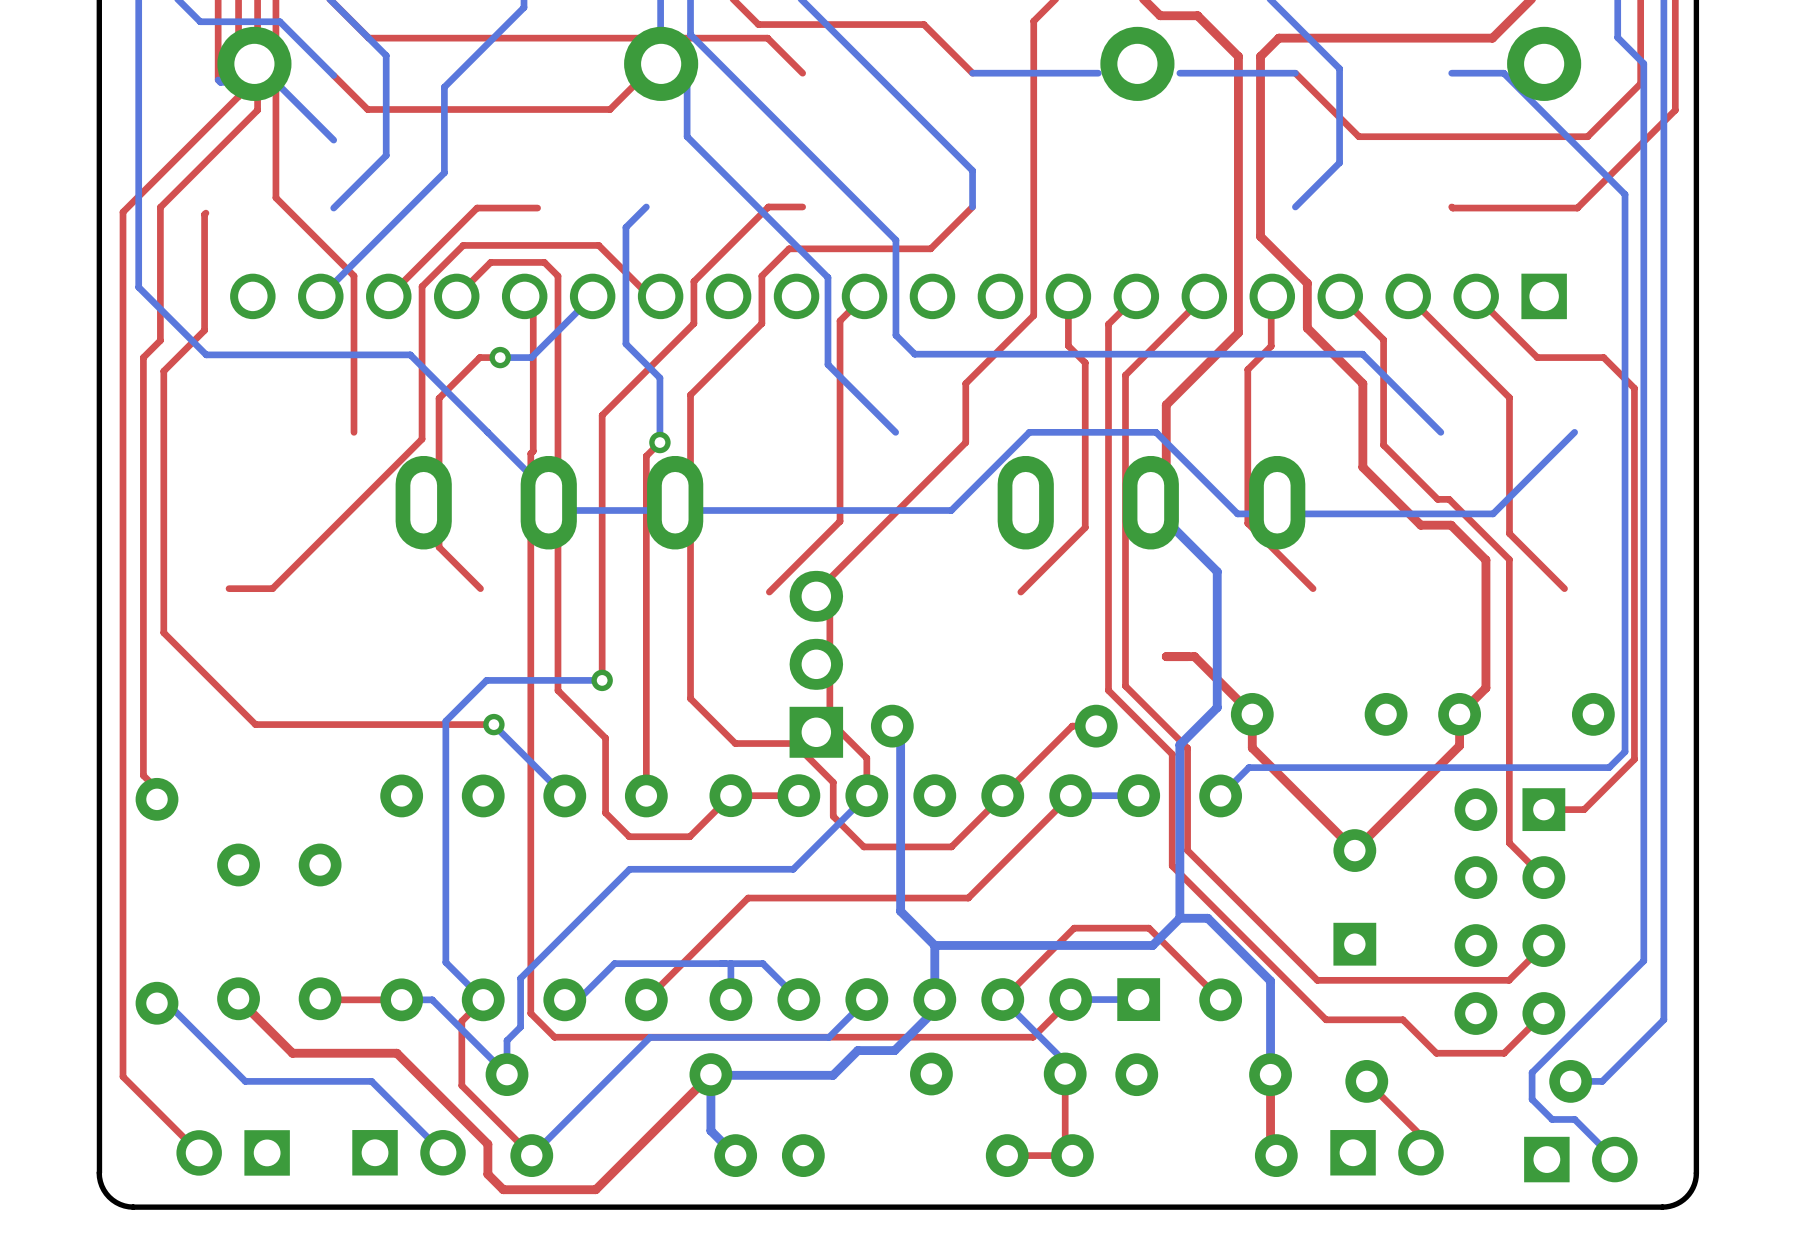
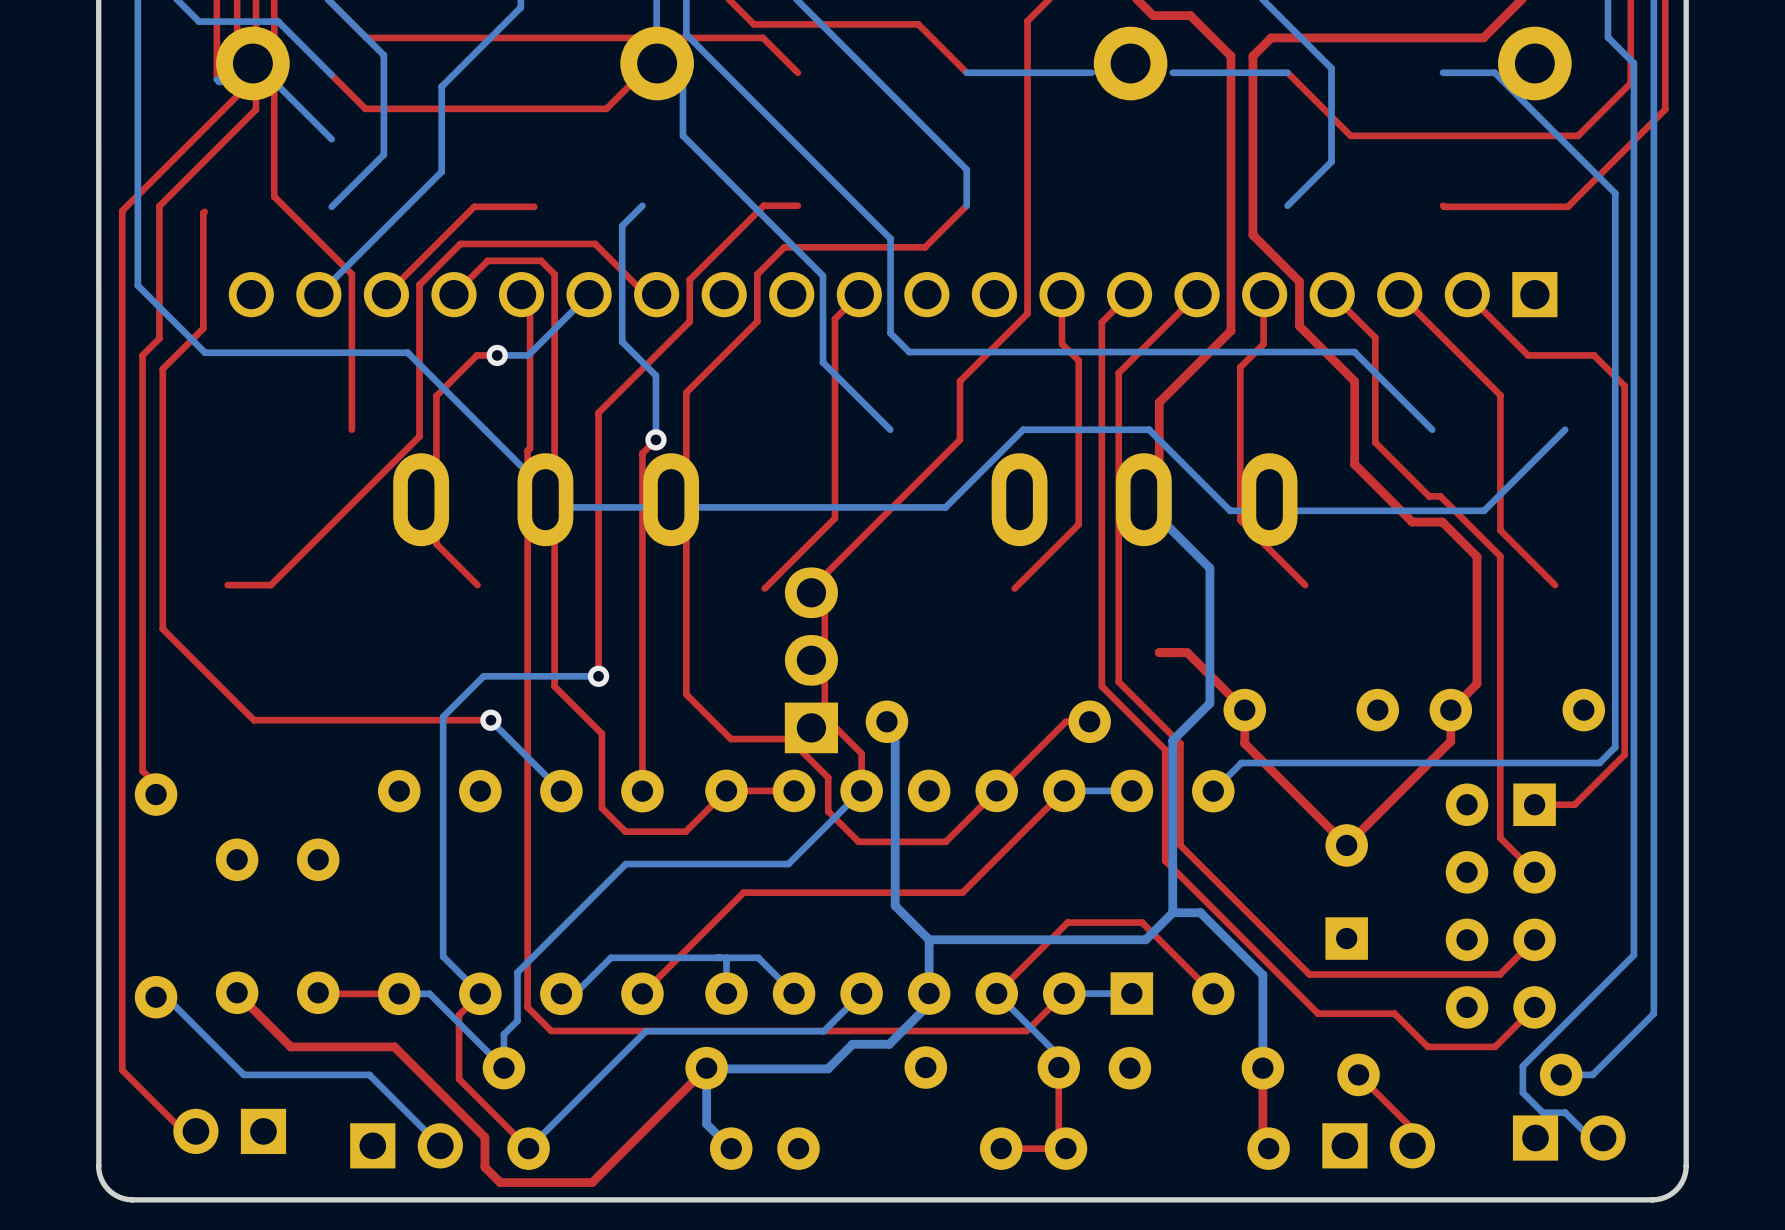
part position: (233, 1152) -> (229, 1131)
part position: (1580, 1159) -> (1569, 1138)

